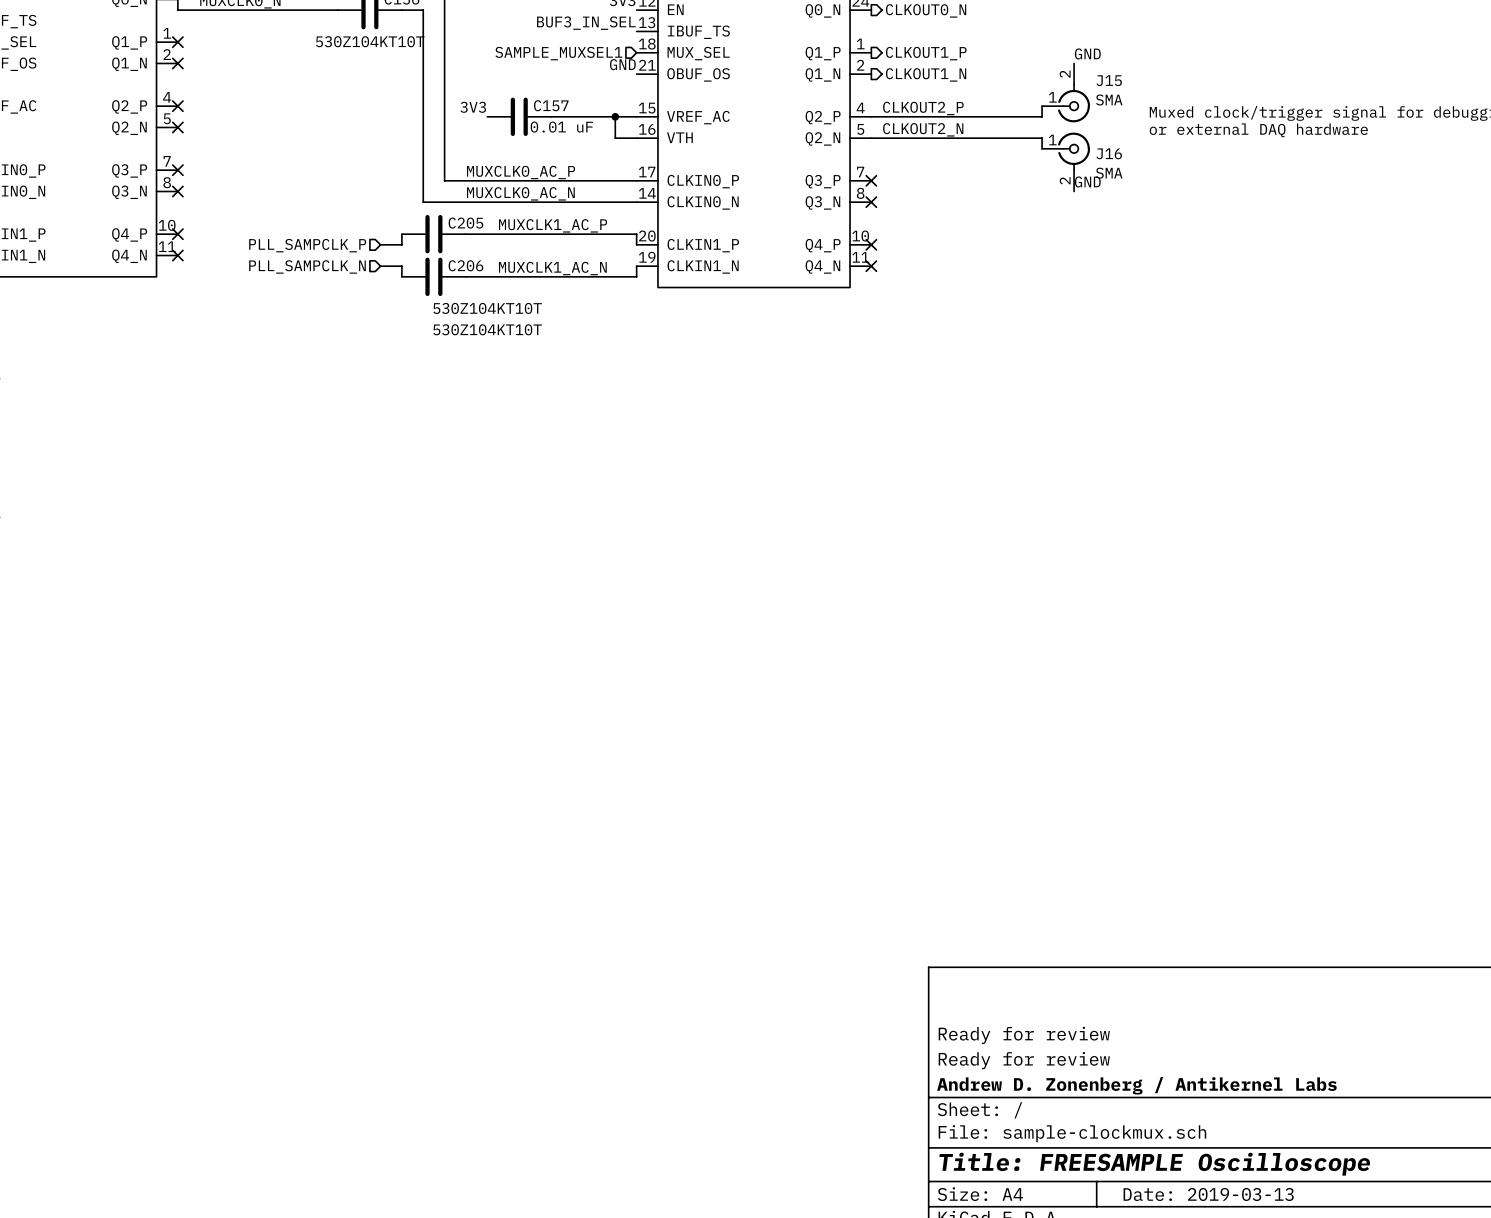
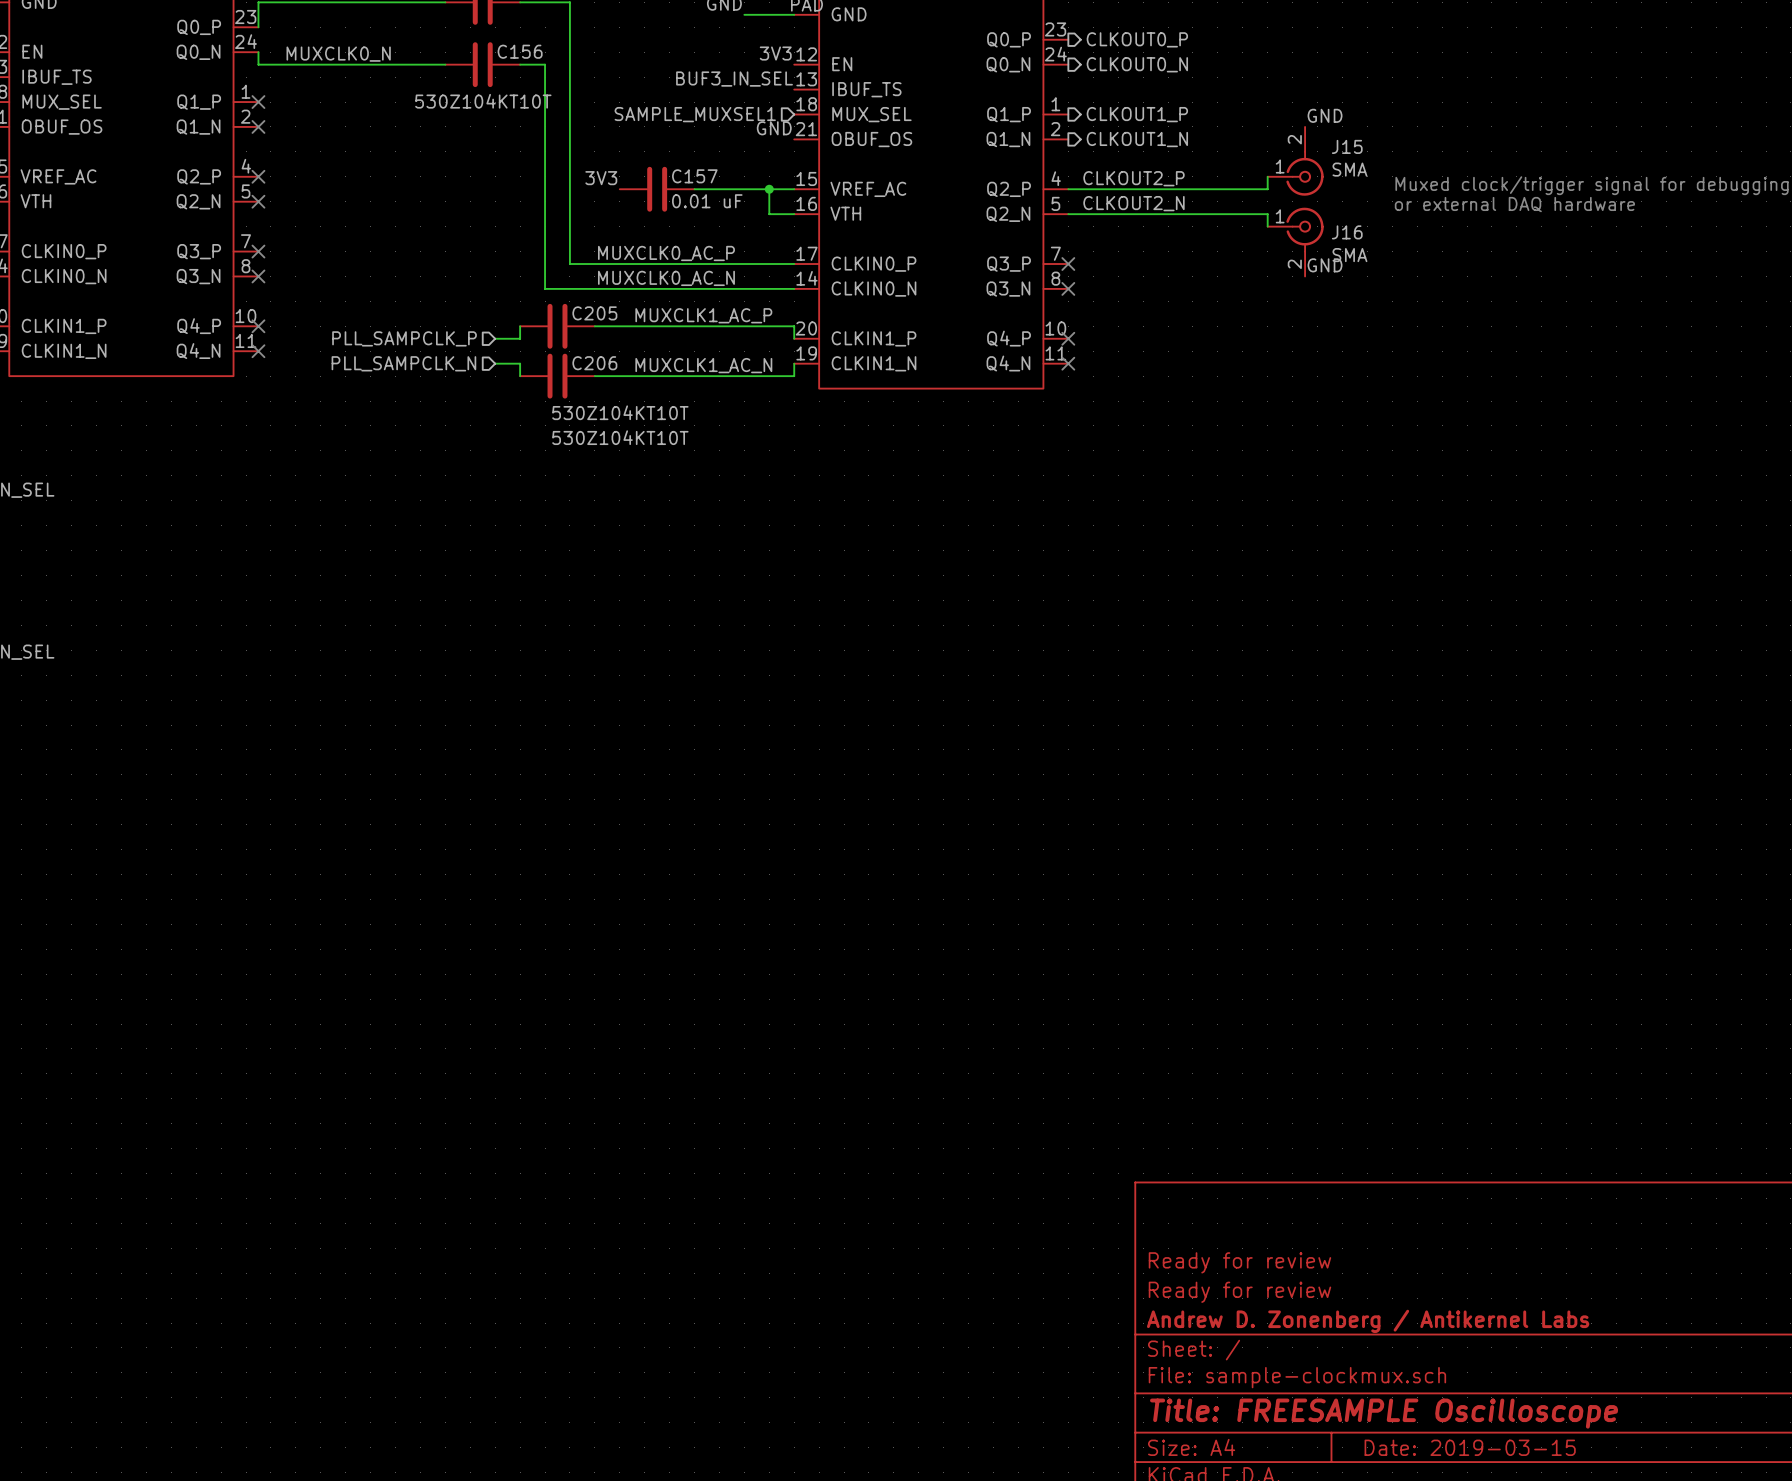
title block: Date: 2019-03-13 (1208, 1194) -> Date: 2019-03-15 (1470, 1447)

